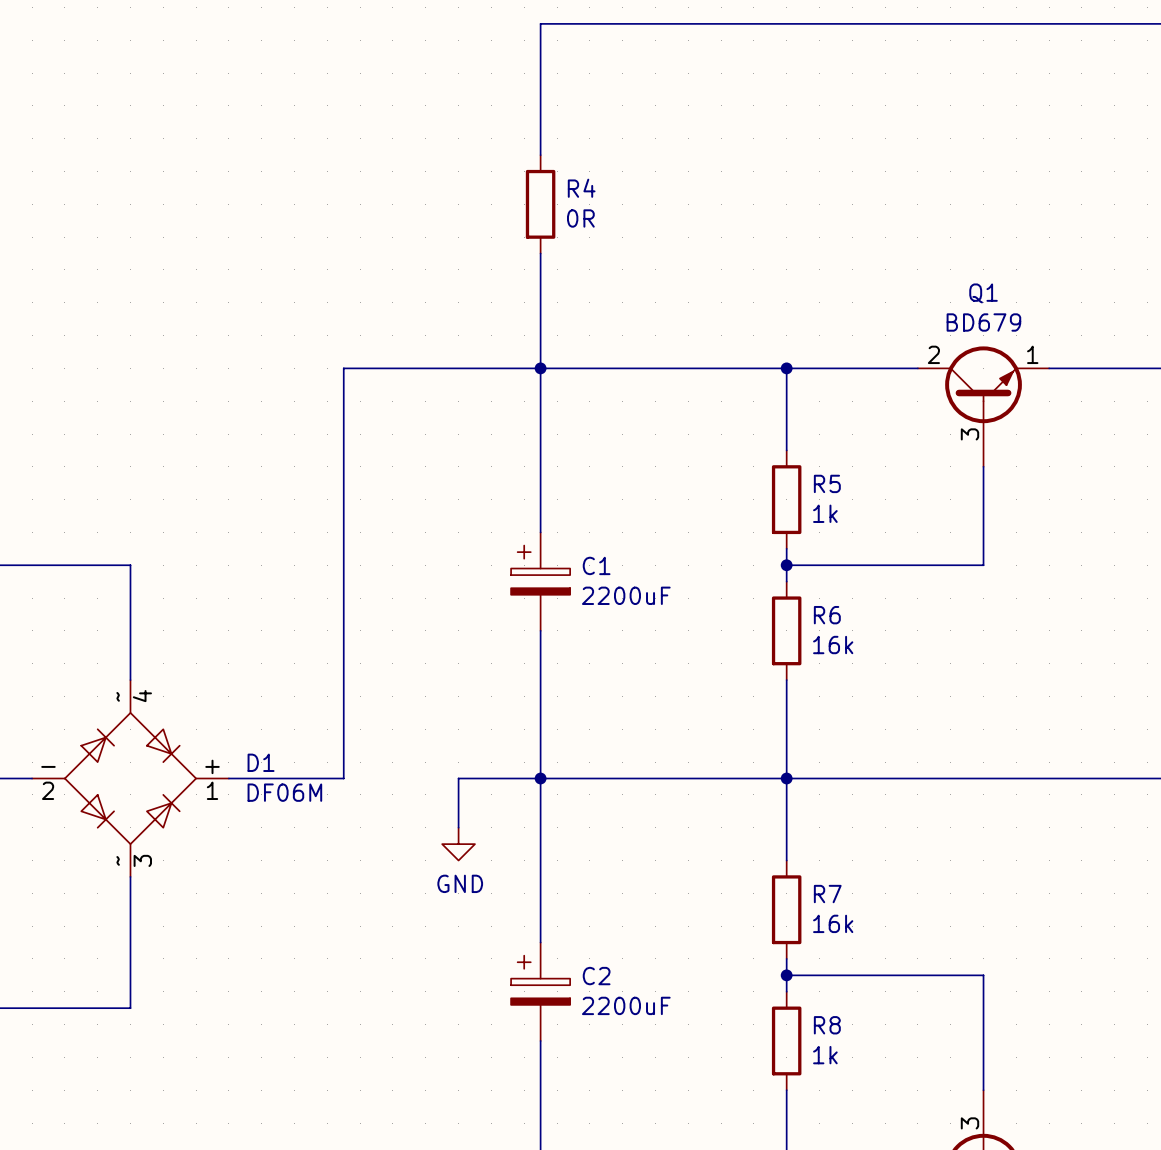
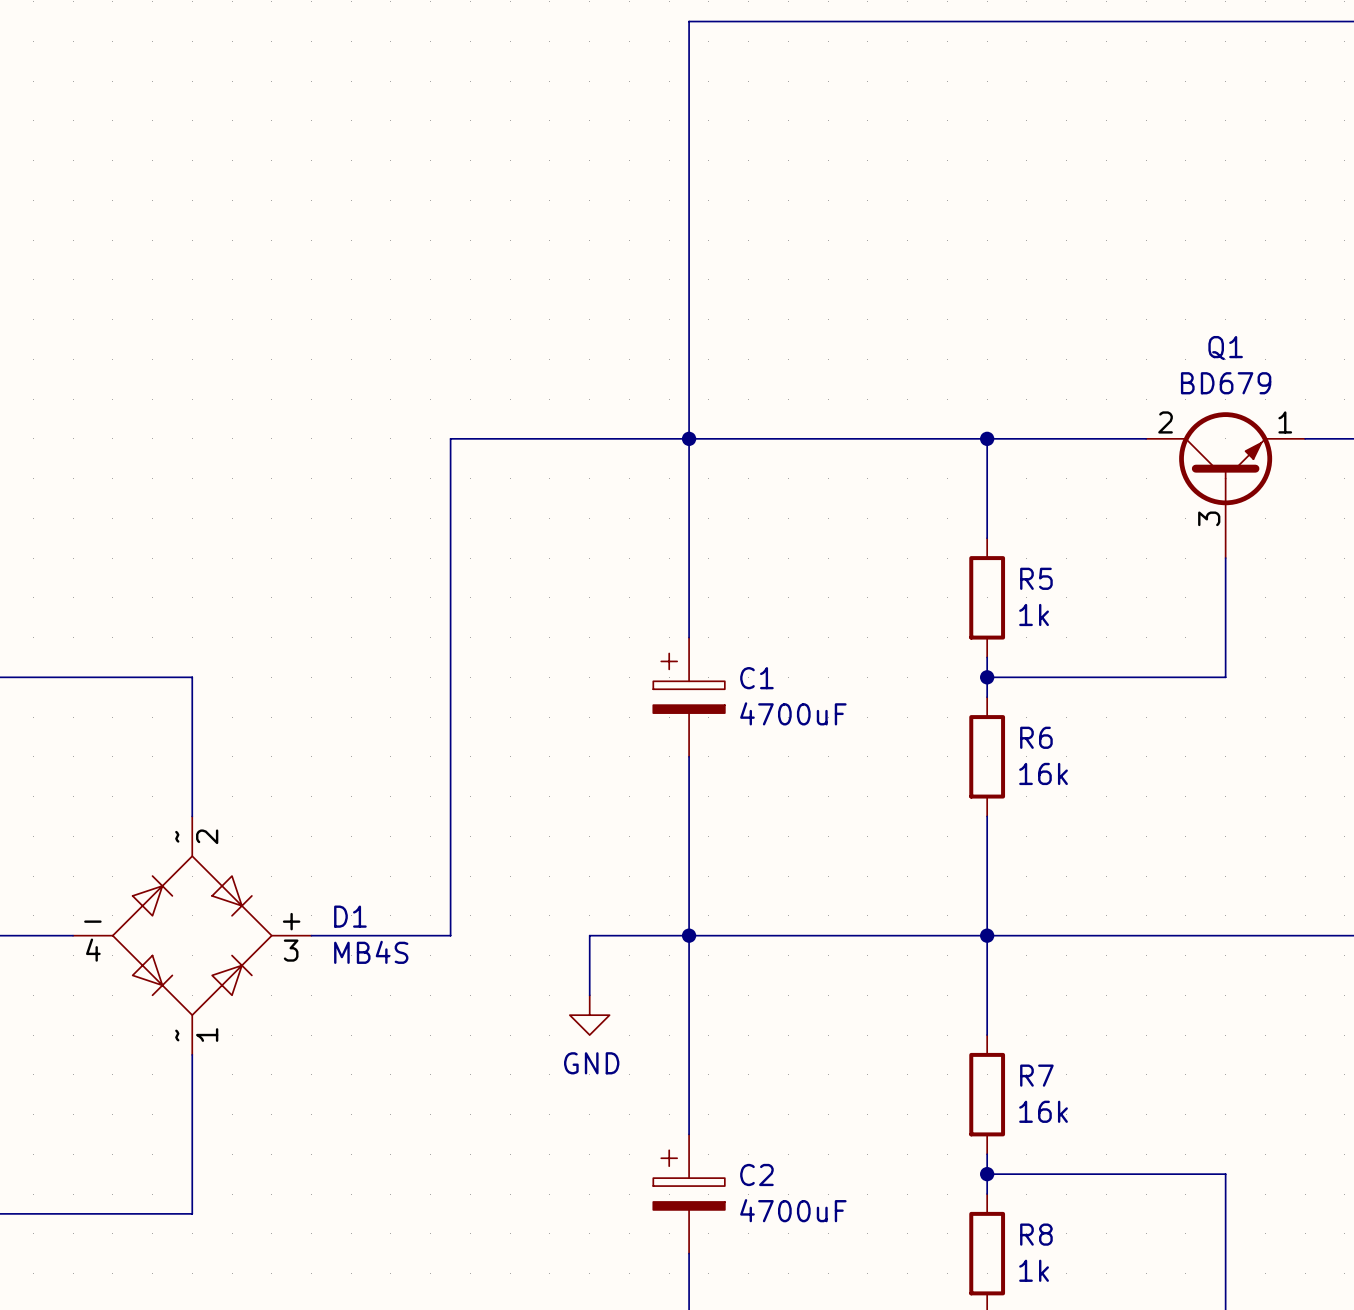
wire: none -> (689, 180) (689, 299)
R4: 0R (540, 204) -> none
C1 value: 2200uF (626, 595) -> 4700uF (793, 713)
D1 pin number: 4 (142, 696) -> 2 (207, 836)
D1 pin number: 2 (48, 790) -> 4 (93, 950)
D1 pin number: 1 (212, 790) -> 3 (291, 950)
D1 value: DF06M (284, 792) -> MB4S (371, 952)
D1 pin number: 3 (142, 860) -> 1 (207, 1035)
C2 value: 2200uF (626, 1005) -> 4700uF (793, 1210)

